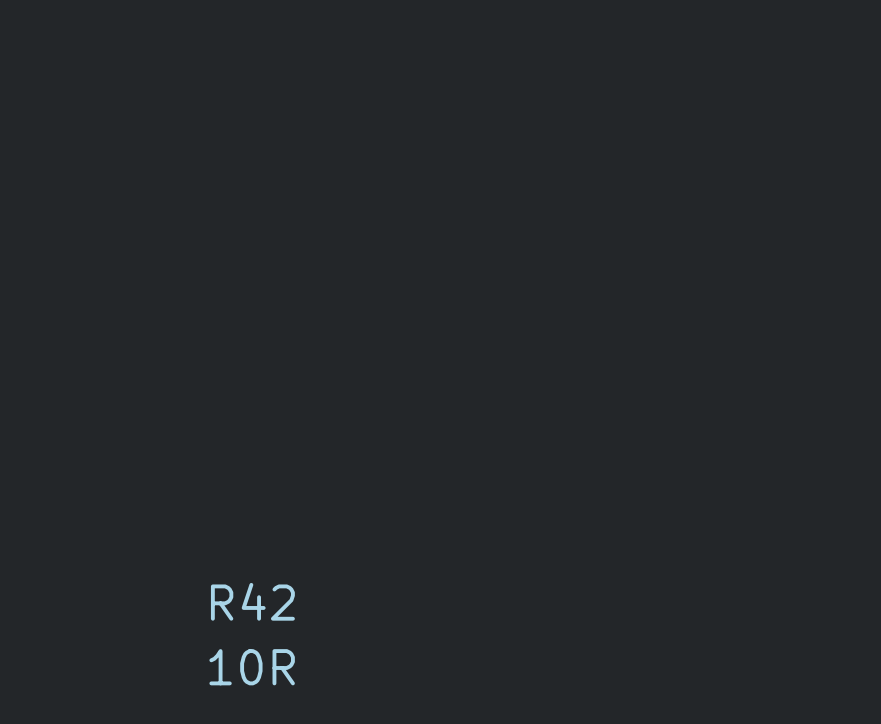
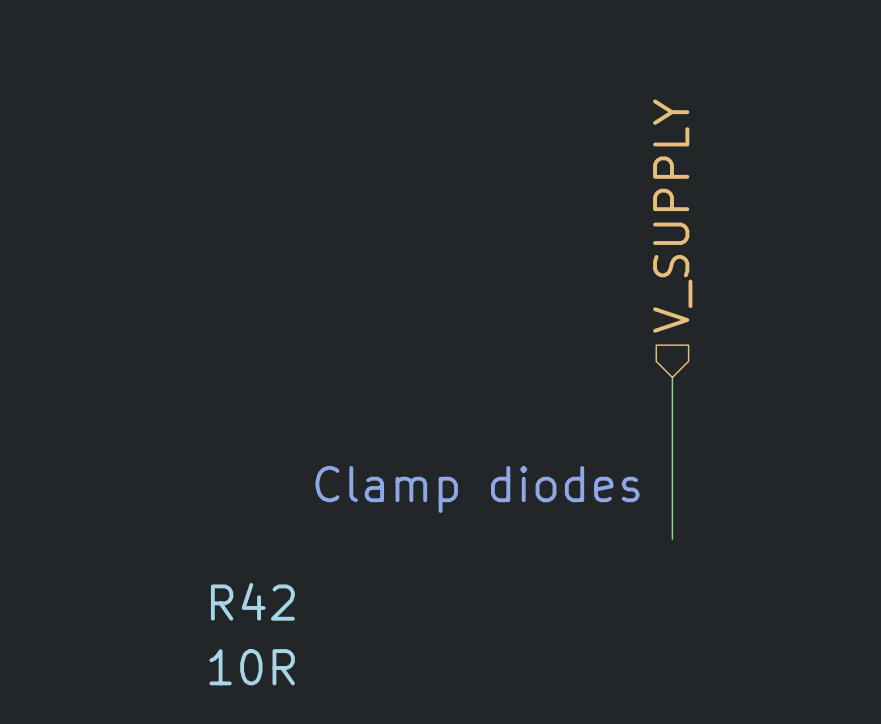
hierarchical label: none -> V_SUPPLY (672, 216)
wire: none -> (672, 377) (672, 539)
text: none -> Clamp diodes (477, 489)

